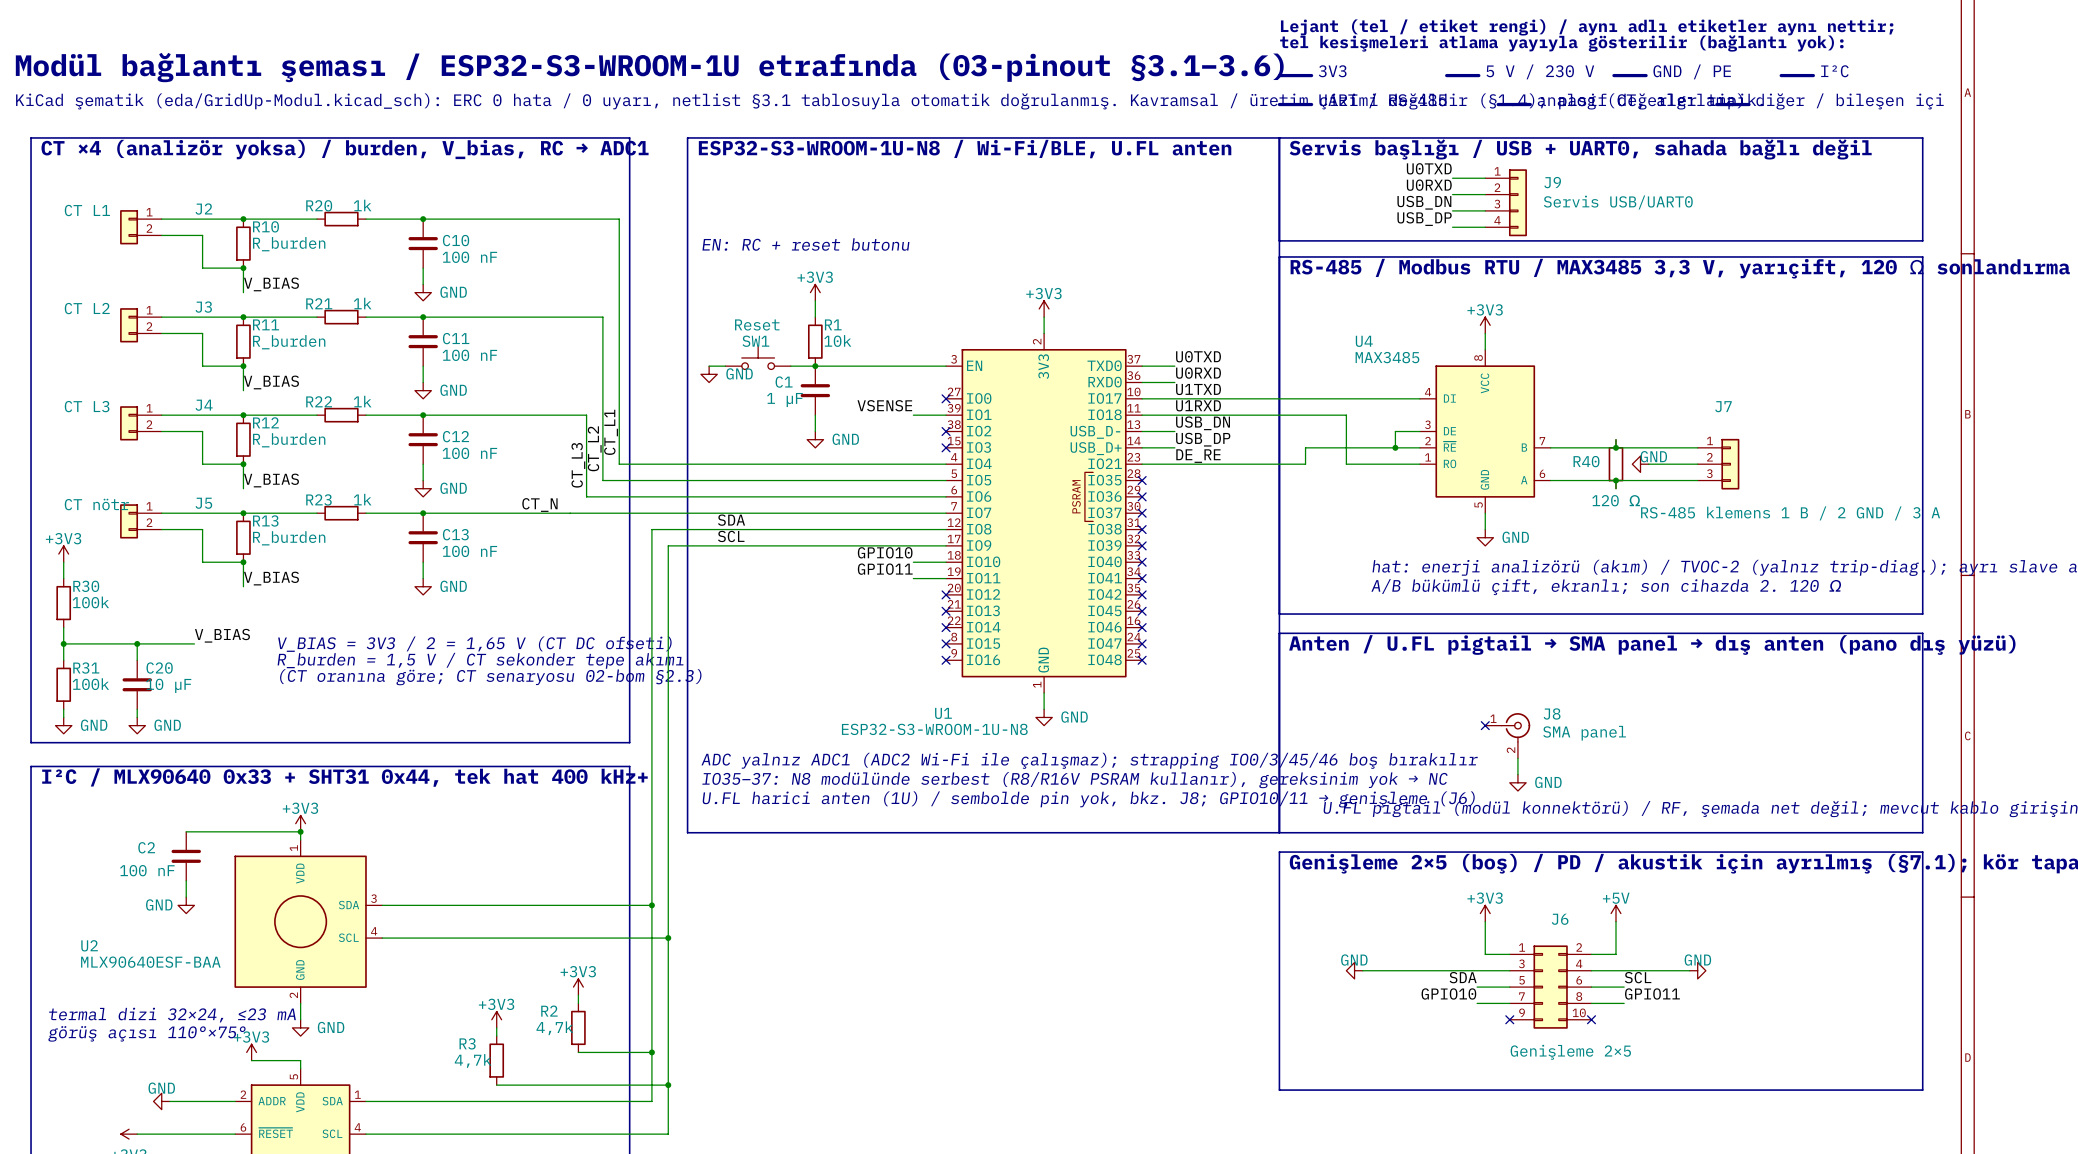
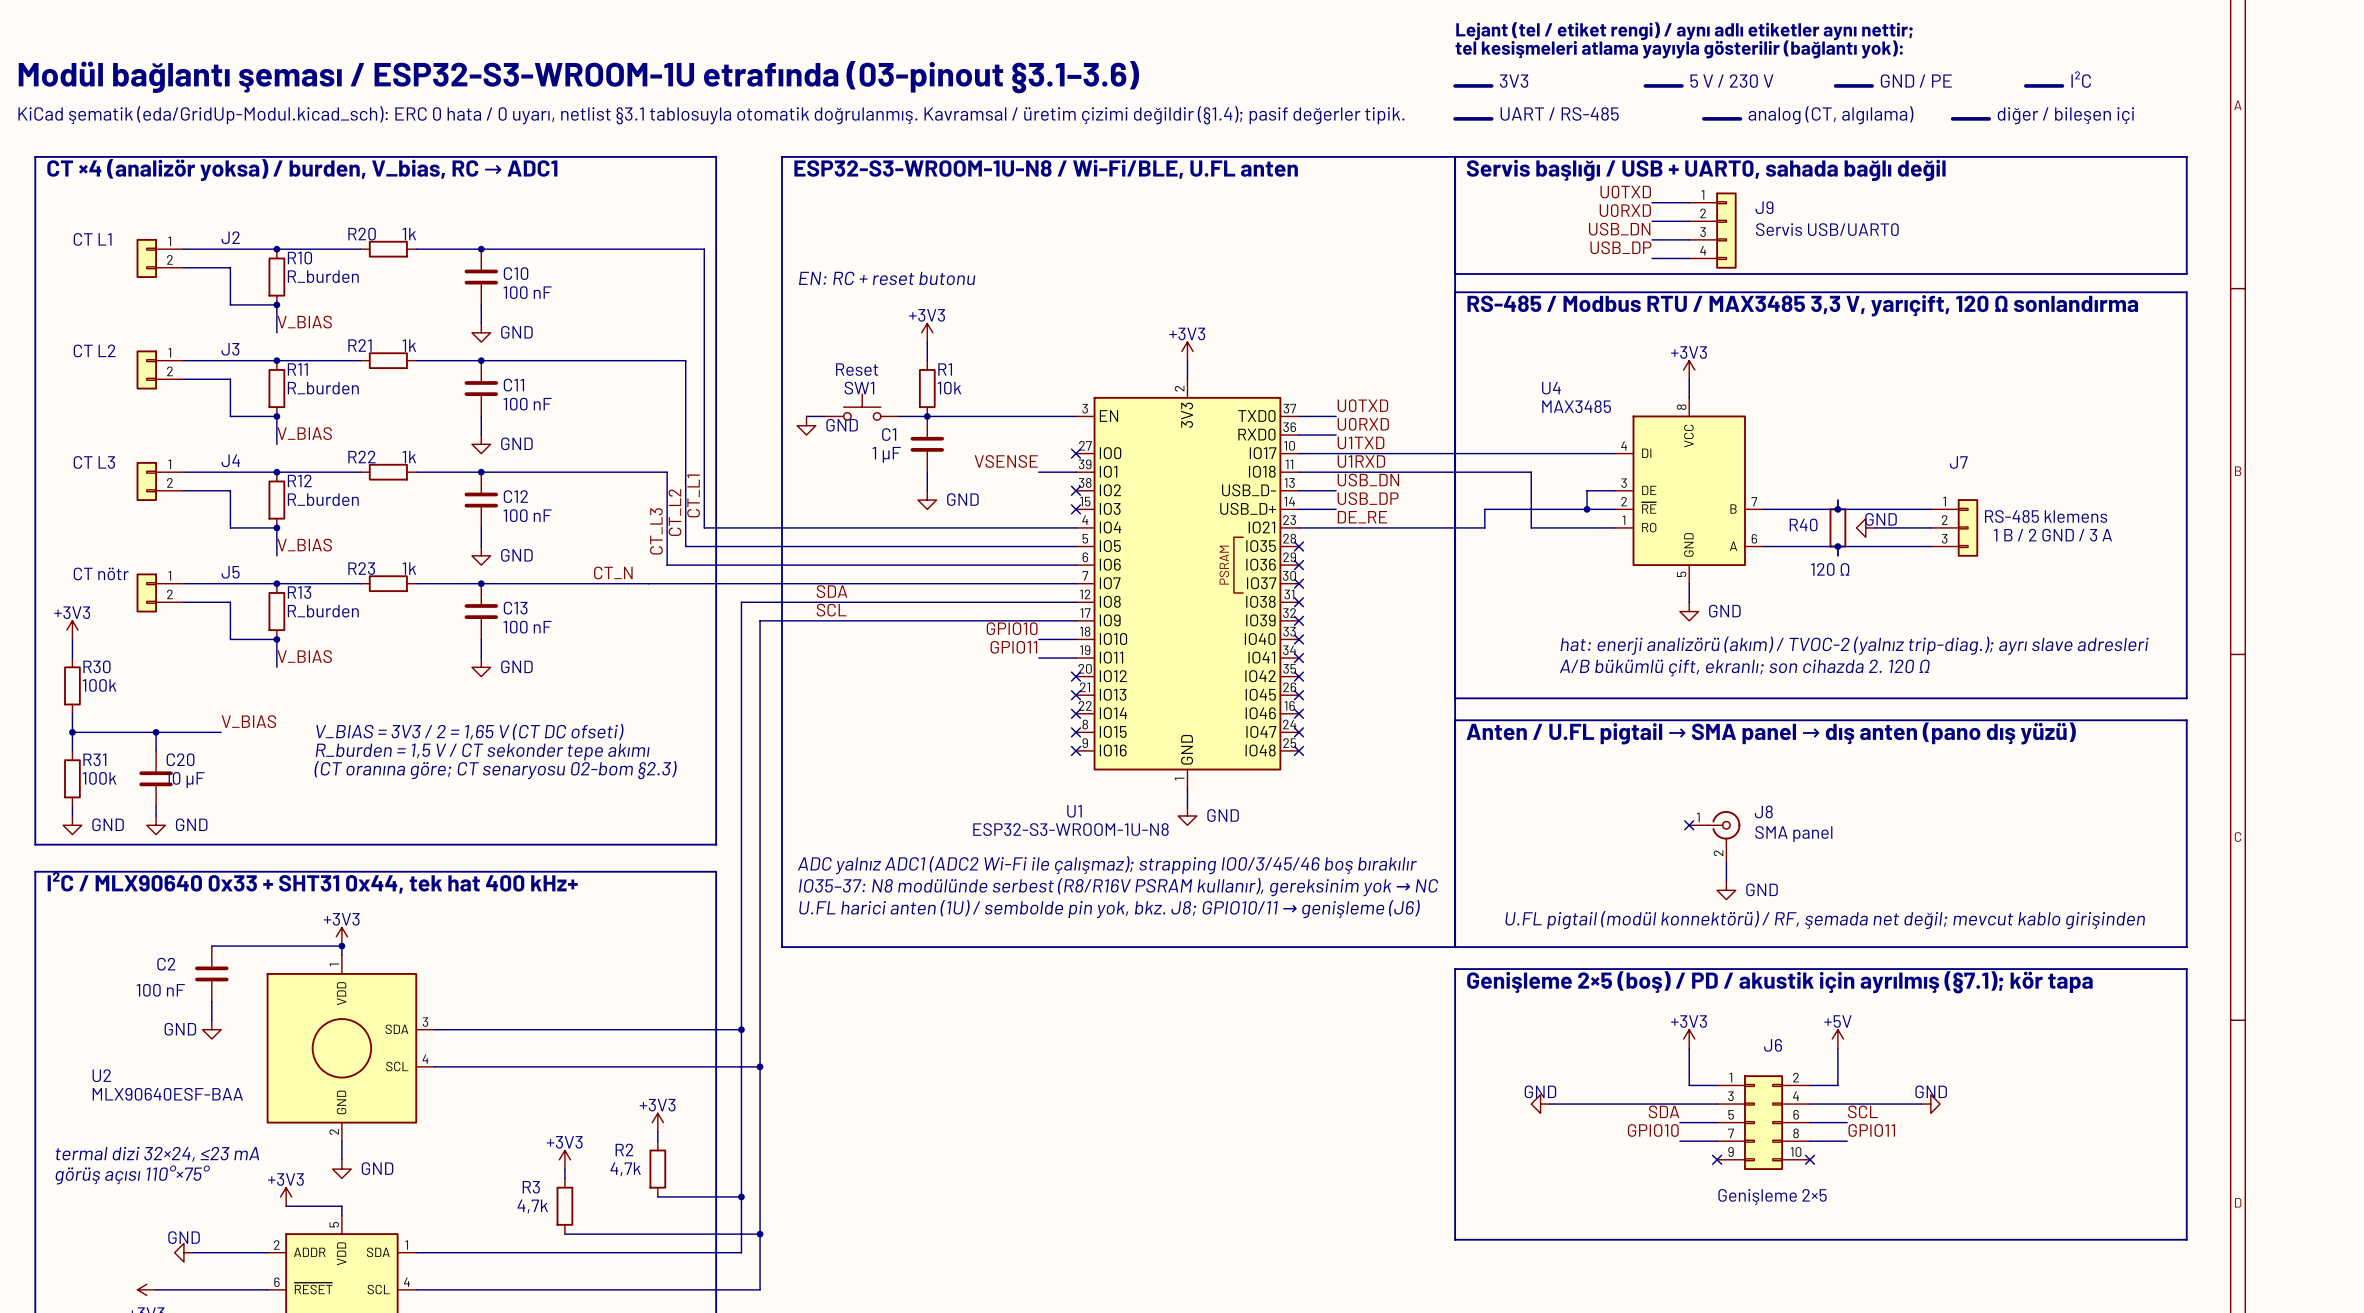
text: none -> 1 B / 2 GND / 3 A (2052, 535)
J7 value: RS-485 klemens 1 B / 2 GND / 3 A (1790, 513) -> RS-485 klemens (2046, 516)

